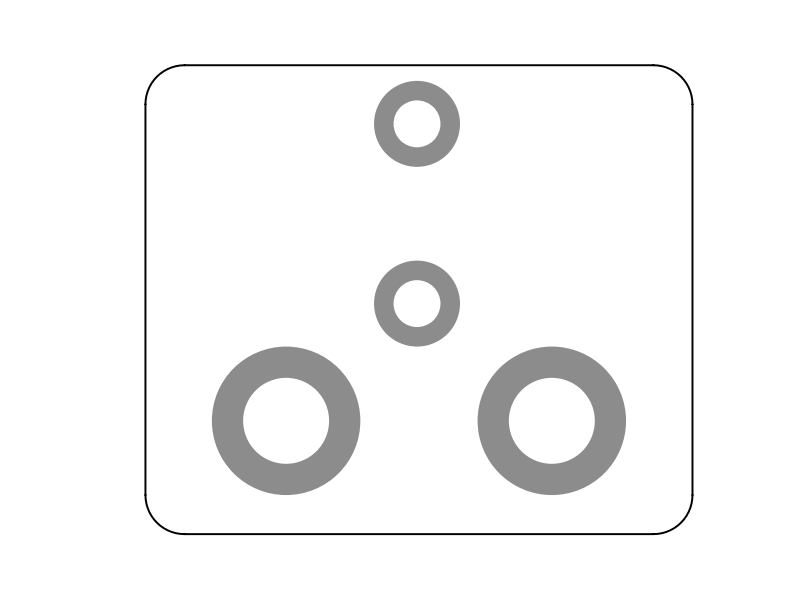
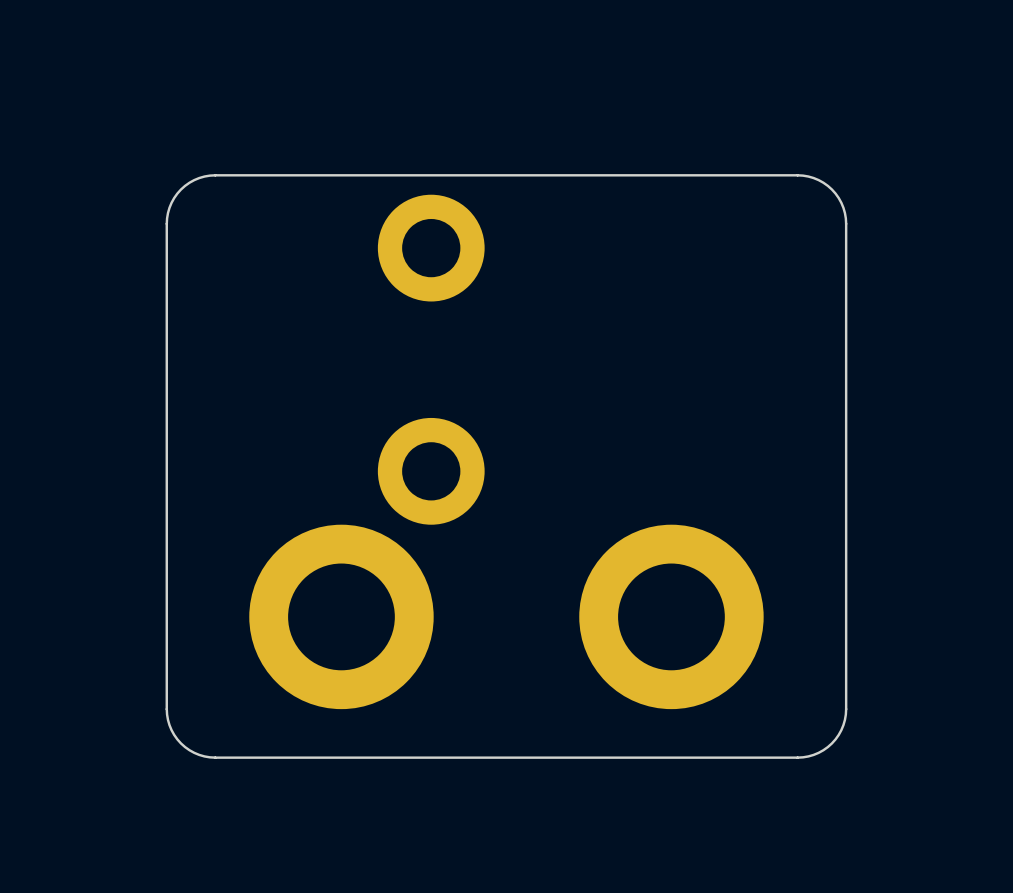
part position: (417, 123) -> (431, 248)
part position: (417, 303) -> (431, 471)

